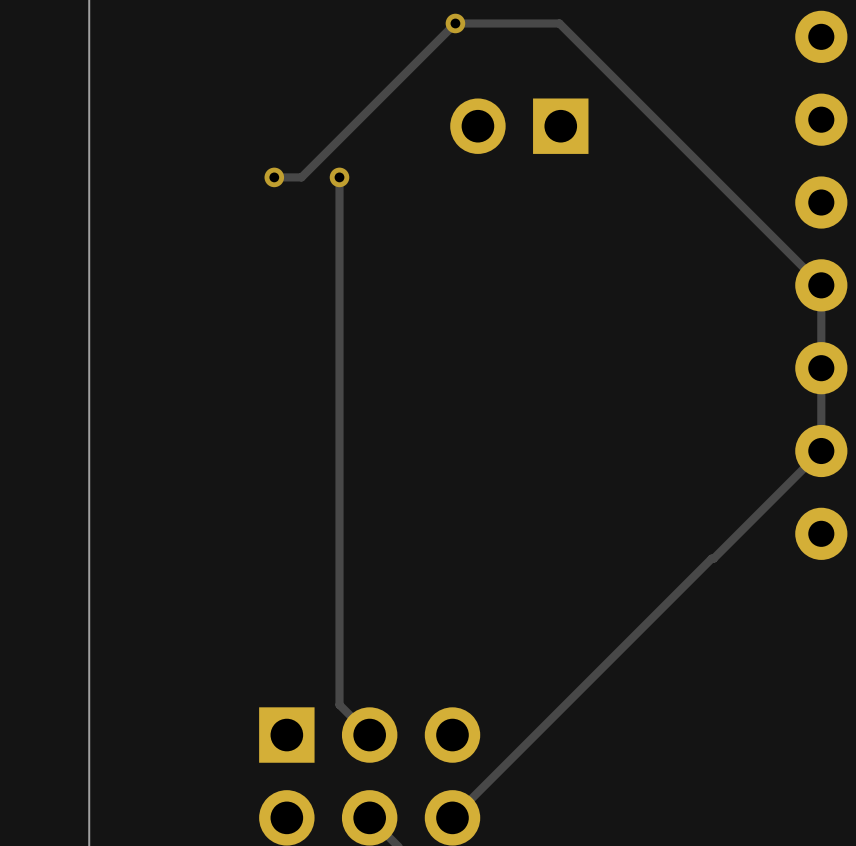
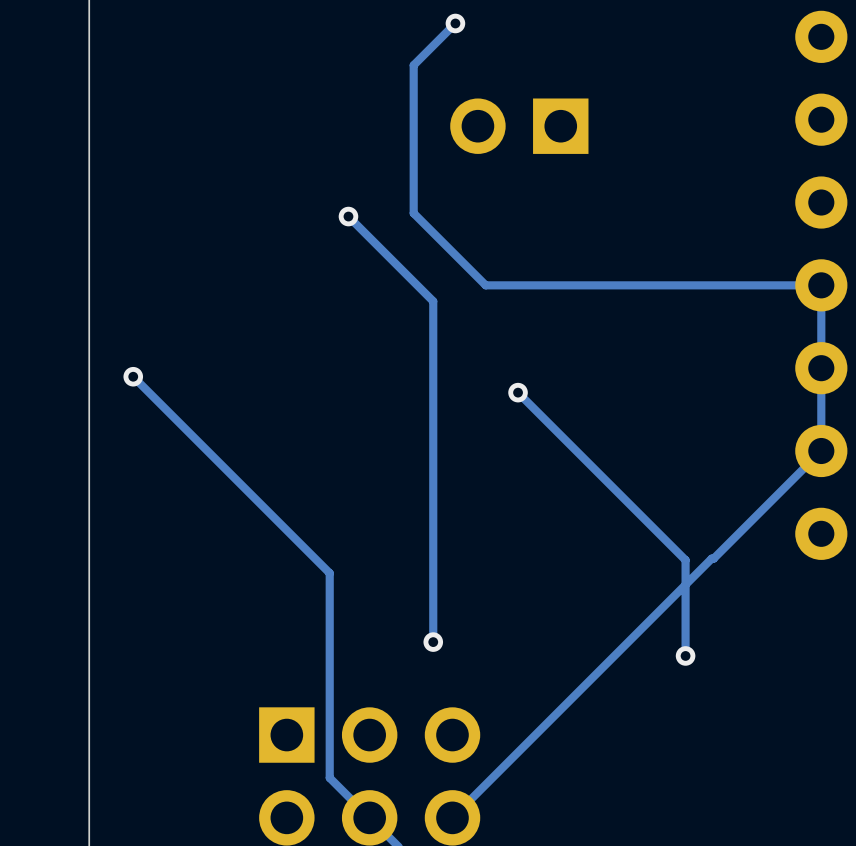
track: (455, 23) (559, 23) (821, 285) -> (413, 65) (413, 213) (485, 285) (821, 285)
track: (413, 65) (301, 177) (274, 177) -> none
via: (274, 177) -> none
track: (339, 177) (339, 704) (369, 735) -> none
via position: (339, 177) -> (348, 216)
track: none -> (348, 216) (433, 301) (433, 642)
track: none -> (133, 376) (329, 573) (329, 777) (369, 817)
via: none -> (133, 376)
track: none -> (518, 392) (685, 560) (685, 655)
via: none -> (518, 392)
via: none -> (433, 642)
via: none -> (685, 655)

